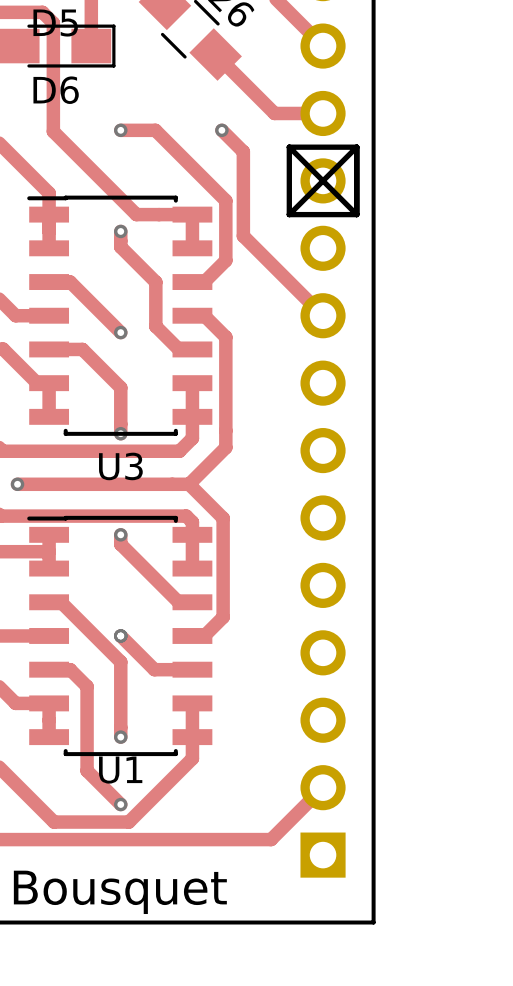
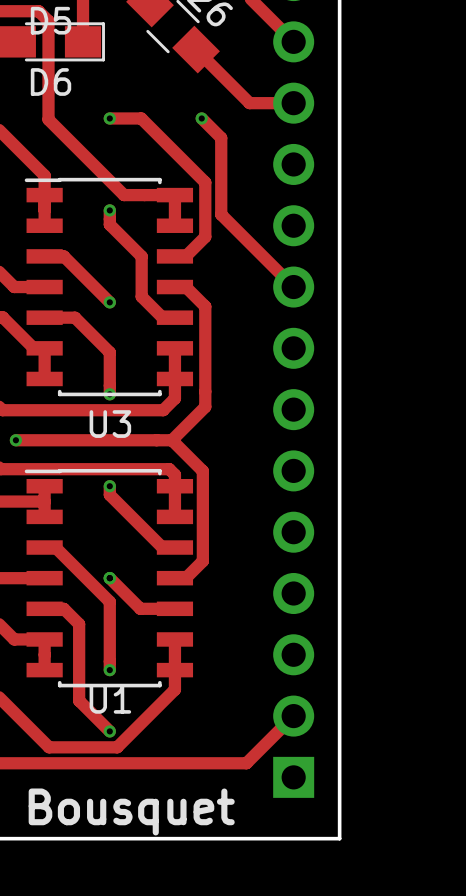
line: (289, 147) (356, 147) -> none
line: (289, 147) (289, 214) -> none
line: (289, 147) (356, 214) -> none
line: (356, 147) (289, 214) -> none
line: (289, 214) (356, 214) -> none

